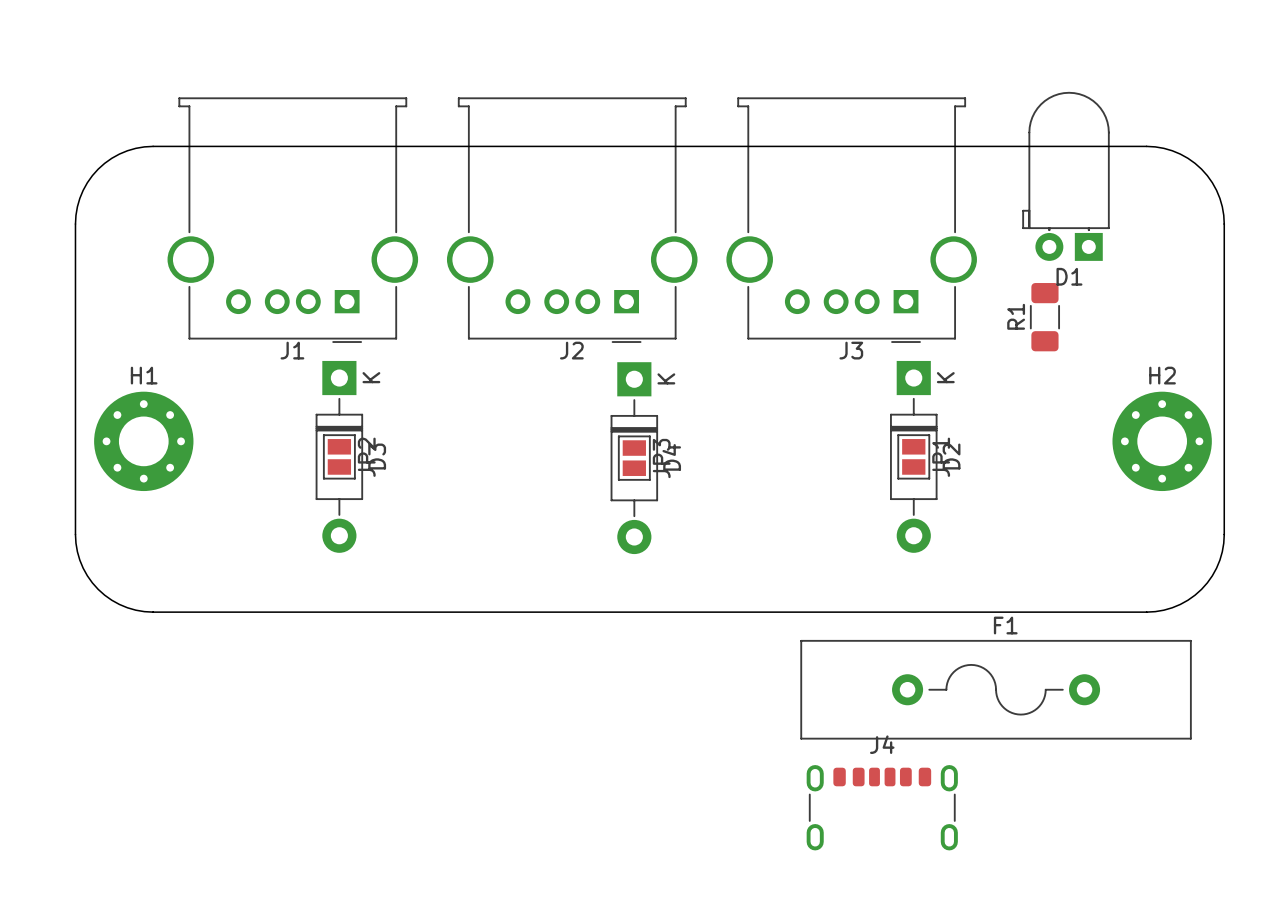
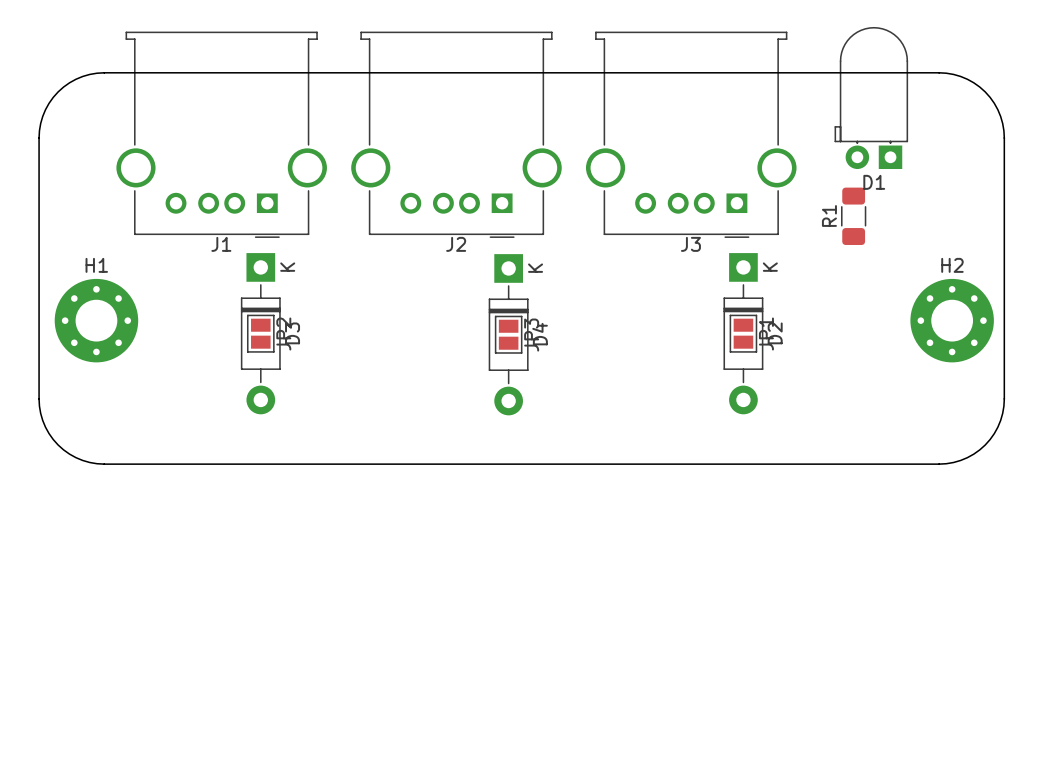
F1: (996, 689) -> none
J4: (882, 807) -> none

